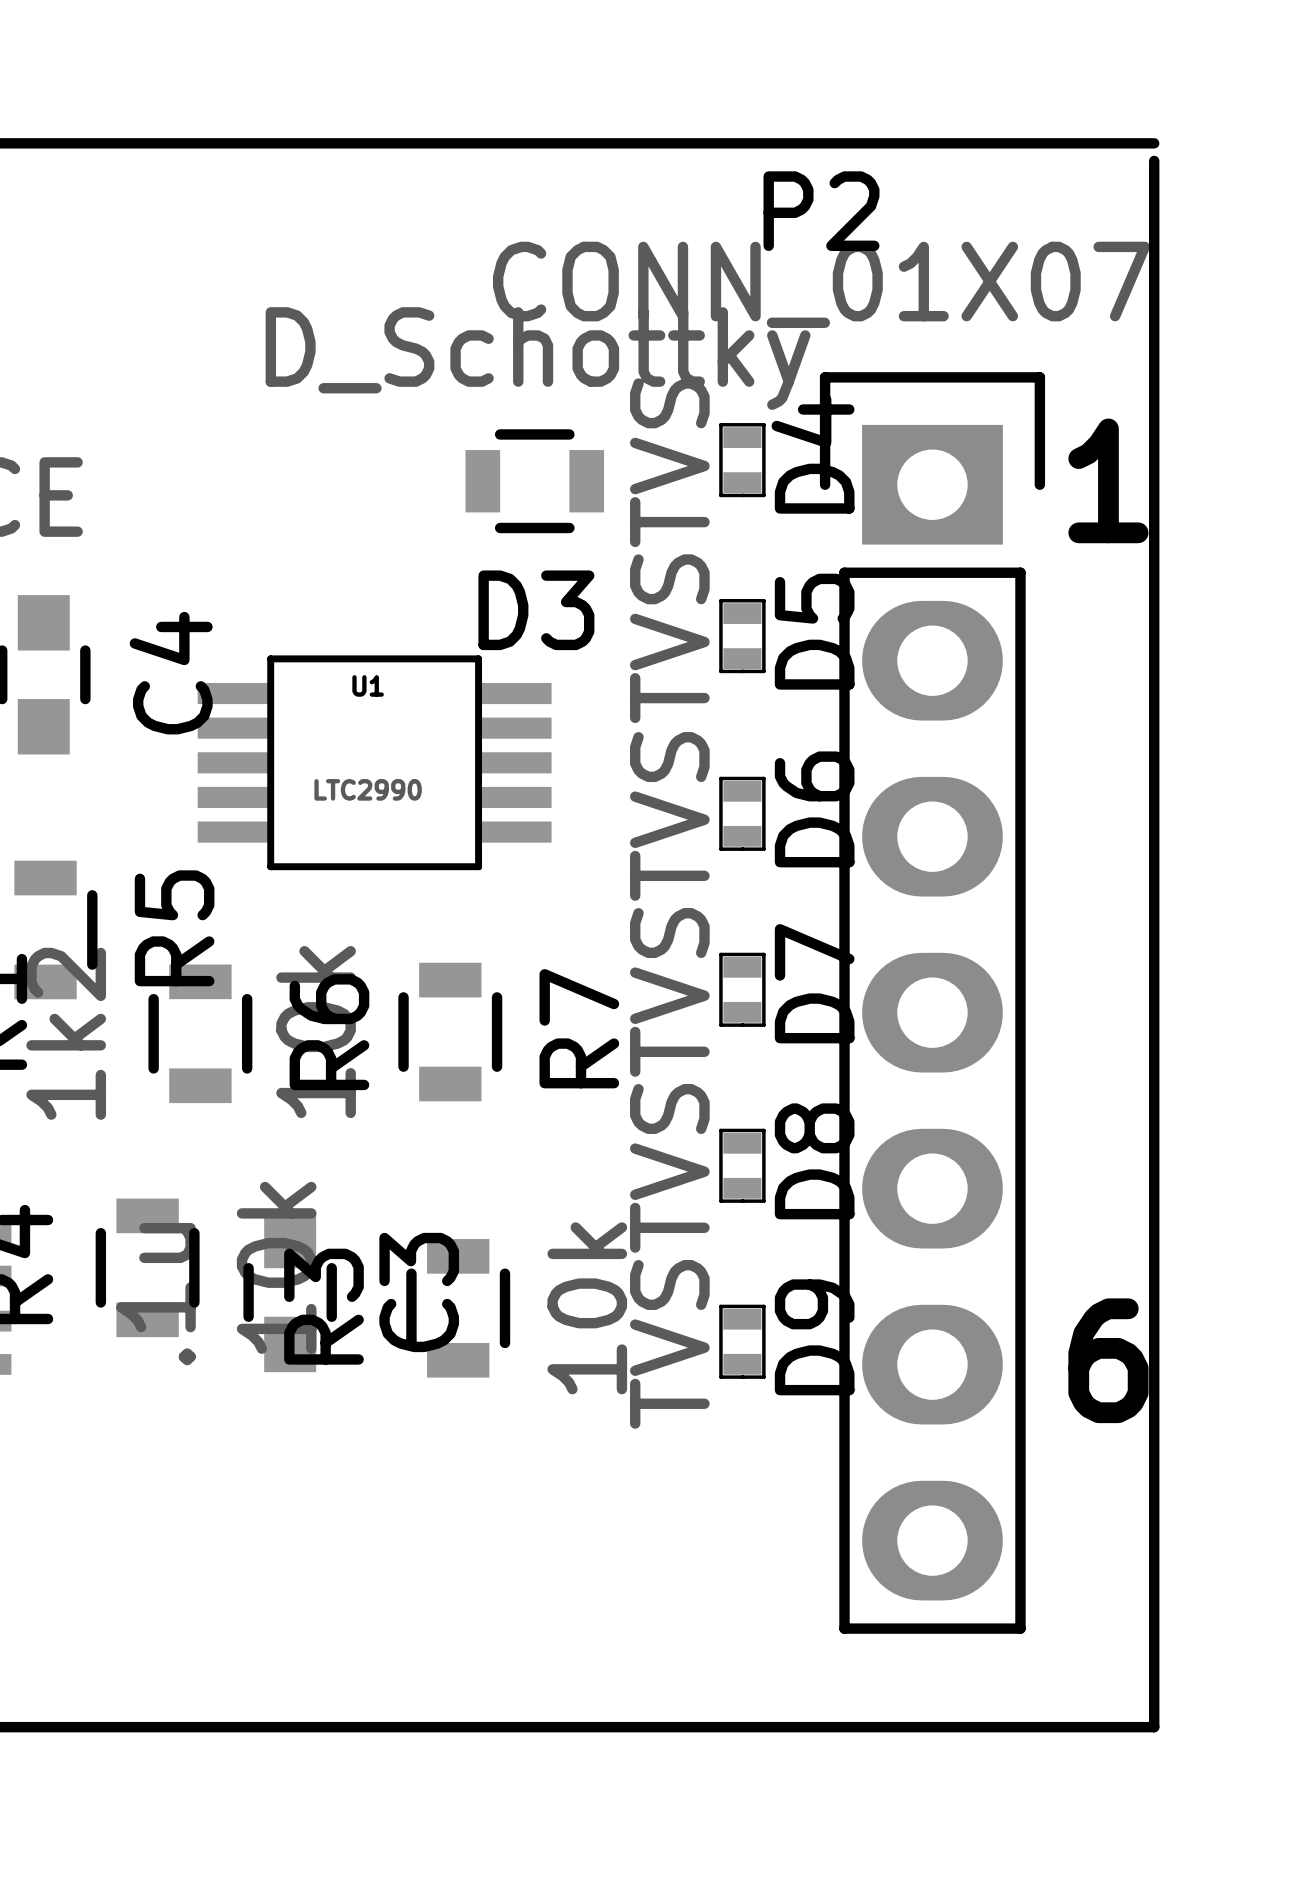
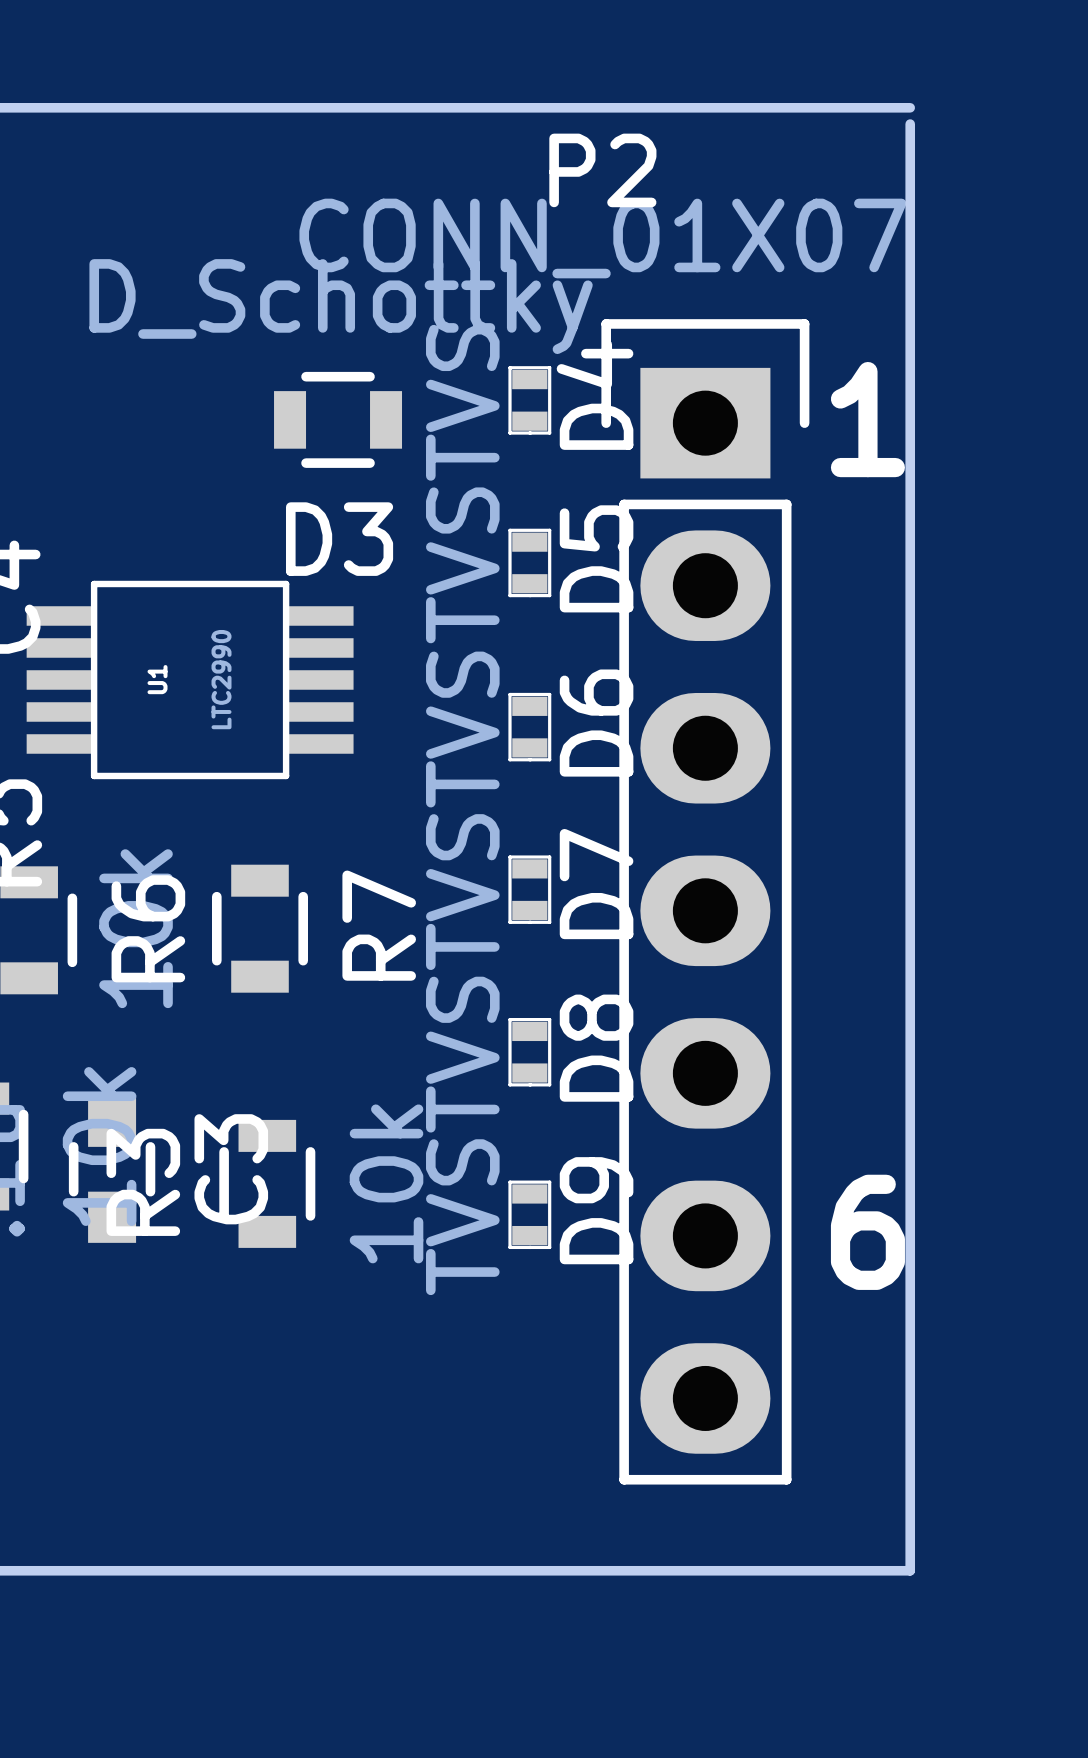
U1 name rotation: 0° (368, 685) -> 90° counterclockwise (157, 679)
U1 name position: U1 (368, 685) -> U1 (157, 679)
U1 value rotation: 0° (368, 789) -> 90° counterclockwise (221, 679)

